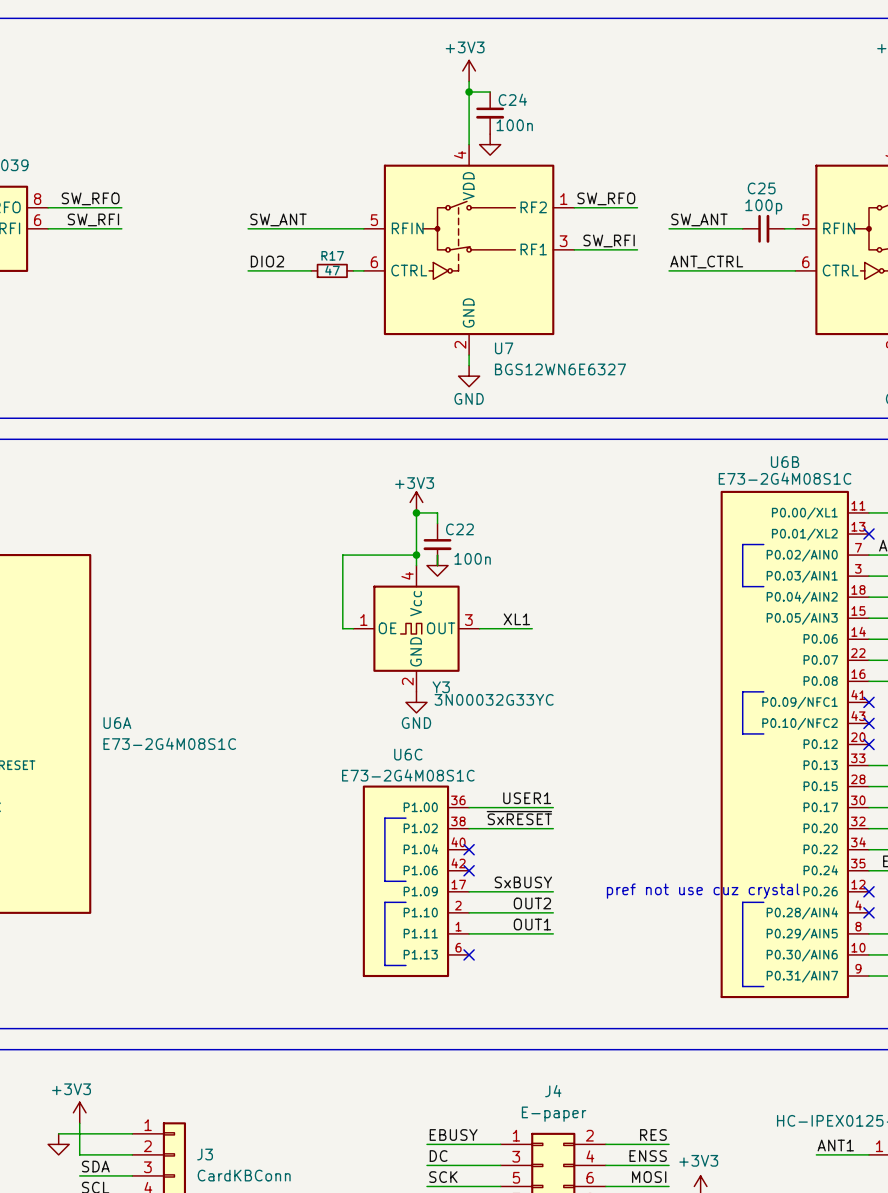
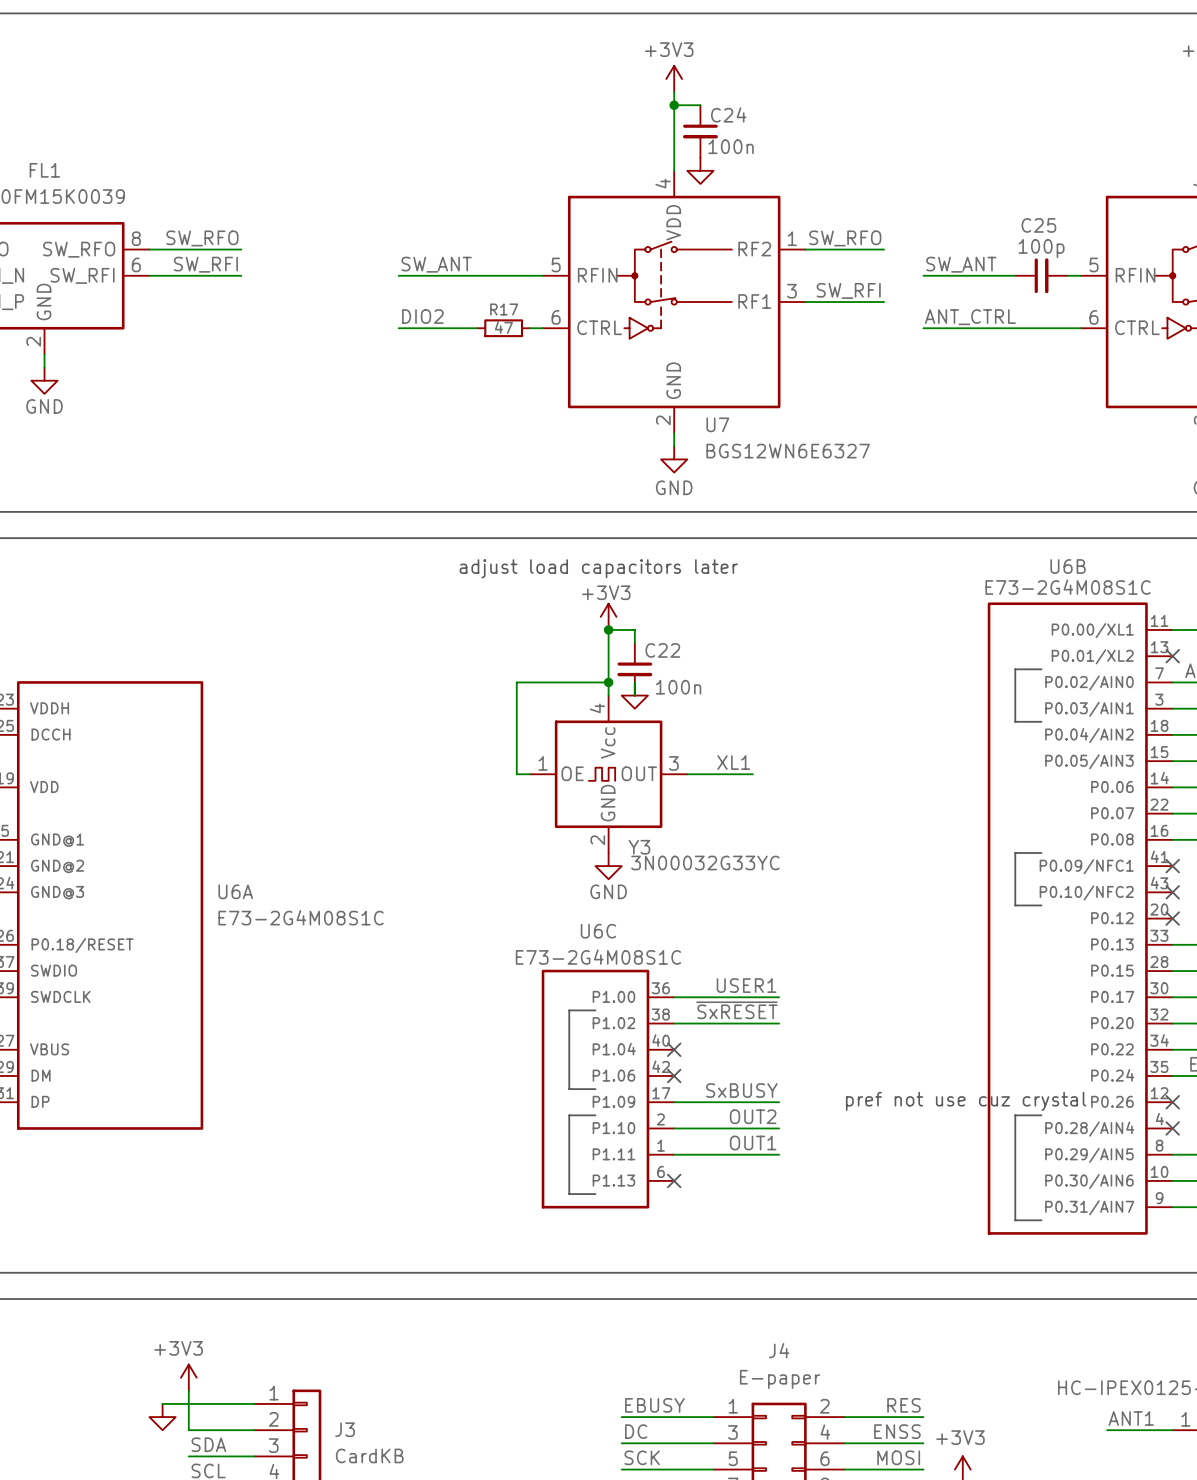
text: none -> adjust load capacitors later (598, 568)
J3 value: CardKBConn (244, 1175) -> CardKB (369, 1455)

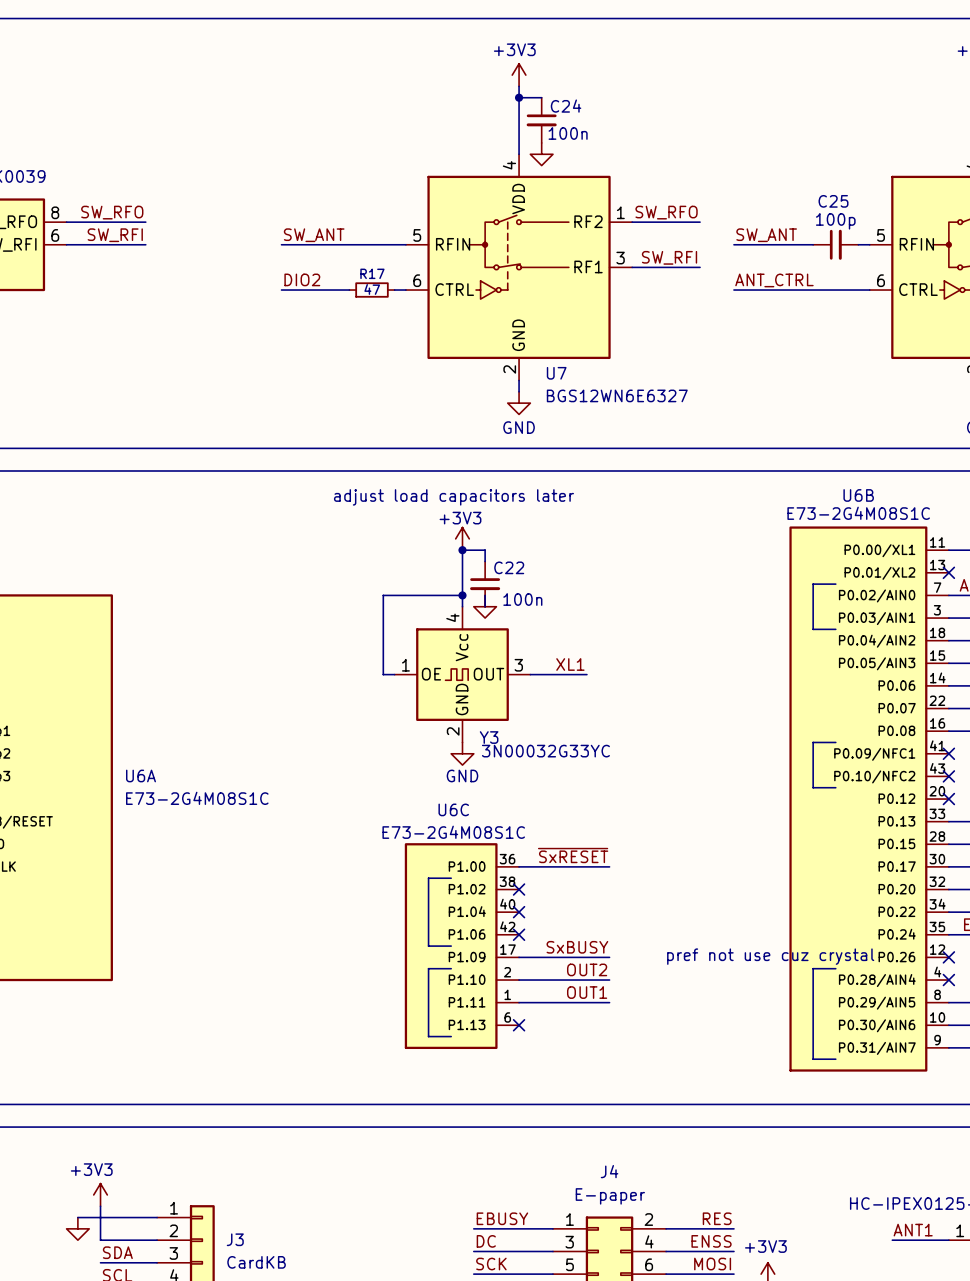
label: USER1 (746, 985) -> ~{SxRESET} (573, 855)
label: ~{SxRESET} (736, 1010) -> none
wire: (674, 1023) (779, 1023) -> none
no-connect mark: none -> (519, 889)

